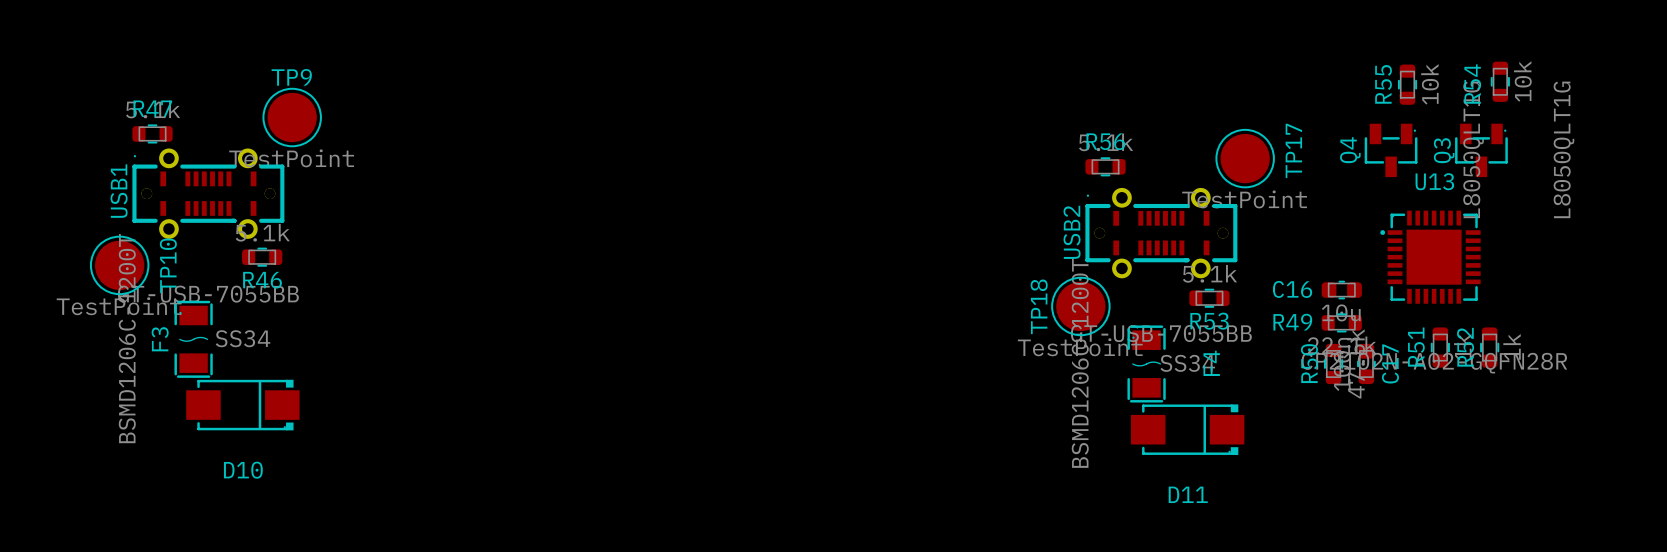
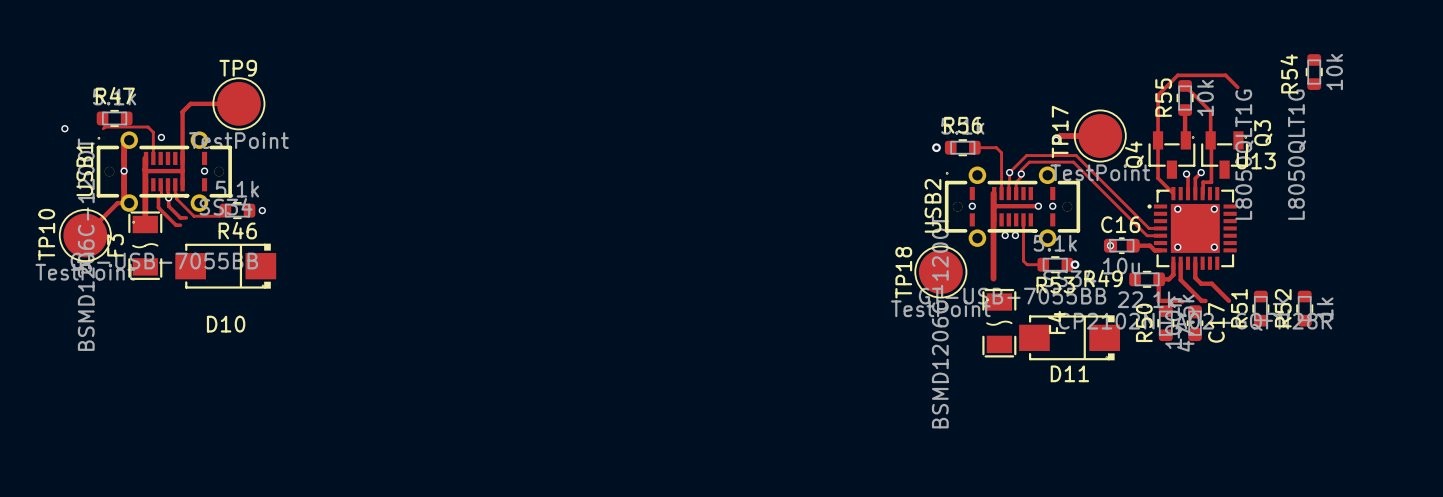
R55 position: (1407, 84) -> (1185, 97)
track: none -> (1185, 85) (1210, 111) (1211, 182) (1203, 182) (1202, 193)
track: none -> (1237, 87) (1225, 75) (1177, 75) (1158, 95) (1158, 178) (1173, 193)
track: none -> (238, 103) (190, 103) (182, 111) (182, 184)
track: none -> (1185, 110) (1185, 140)
via: none -> (64, 128)
track: none -> (103, 128) (104, 127) (148, 127) (153, 132) (153, 158)
TP17 name position: TP17 (1293, 150) -> TP17 (1060, 131)
Q4 position: (1391, 150) -> (1171, 155)
Q3 position: (1481, 150) -> (1224, 155)
via: none -> (161, 137)
track: none -> (129, 140) (124, 145) (124, 197) (129, 203) (117, 203) (85, 235)
track: none -> (1056, 140) (1060, 136) (1082, 136) (1087, 140)
via: none -> (1056, 140)
TP17 position: (1245, 158) -> (1100, 136)
via: none -> (936, 147)
track: none -> (974, 147) (996, 147) (1001, 152) (1001, 193)
track: none -> (145, 158) (145, 224)
track: none -> (145, 169) (182, 171)
via: none -> (124, 171)
via: none -> (204, 171)
via: none -> (1009, 172)
track: none -> (1186, 172) (1188, 193)
track: none -> (1201, 172) (1195, 178) (1195, 193)
via: none -> (1201, 172)
via: none -> (1021, 174)
via: none -> (1186, 174)
track: none -> (160, 184) (161, 194) (158, 197) (158, 207) (176, 225) (180, 225)
track: none -> (167, 184) (168, 206) (180, 217) (186, 217)
track: none -> (175, 184) (176, 199) (193, 216) (219, 216) (225, 210)
track: none -> (993, 193) (993, 278) (994, 193)
track: none -> (1008, 193) (1009, 172) (1026, 155) (1076, 155) (1149, 228) (1160, 228)
track: none -> (1016, 193) (1016, 182) (1021, 176) (1021, 170) (1029, 162) (1073, 162) (1147, 235) (1160, 235)
via: none -> (168, 197)
track: none -> (994, 204) (1038, 206)
via: none -> (972, 206)
via: none -> (1038, 206)
via: none -> (1052, 206)
via: none -> (1177, 209)
via: none -> (1214, 209)
via: none -> (262, 210)
track: none -> (1023, 219) (1023, 261) (1027, 264) (1043, 264)
R46 position: (262, 257) -> (237, 210)
U13 position: (1430, 257) -> (1192, 228)
TP10 name position: TP10 (168, 265) -> TP10 (46, 234)
via: none -> (1005, 235)
via: none -> (1015, 235)
track: none -> (1133, 244) (1149, 245) (1154, 250) (1160, 250)
via: none -> (1110, 245)
via: none -> (1177, 247)
via: none -> (1214, 247)
C16 name position: C16 (1292, 289) -> C16 (1120, 224)
C16 position: (1341, 290) -> (1121, 245)
track: none -> (1173, 263) (1173, 274) (1168, 279) (1158, 279) (1158, 300) (1182, 301)
track: none -> (1180, 263) (1180, 279) (1201, 300) (1205, 300)
track: none -> (1195, 263) (1195, 277) (1201, 283) (1211, 283) (1228, 300)
via: none -> (1075, 264)
R49 position: (1341, 322) -> (1147, 279)
F3 position: (193, 339) -> (145, 245)
D10 position: (242, 405) -> (225, 266)
D11 position: (1187, 429) -> (1069, 337)
D11 name position: D11 (1188, 494) -> D11 (1069, 373)

